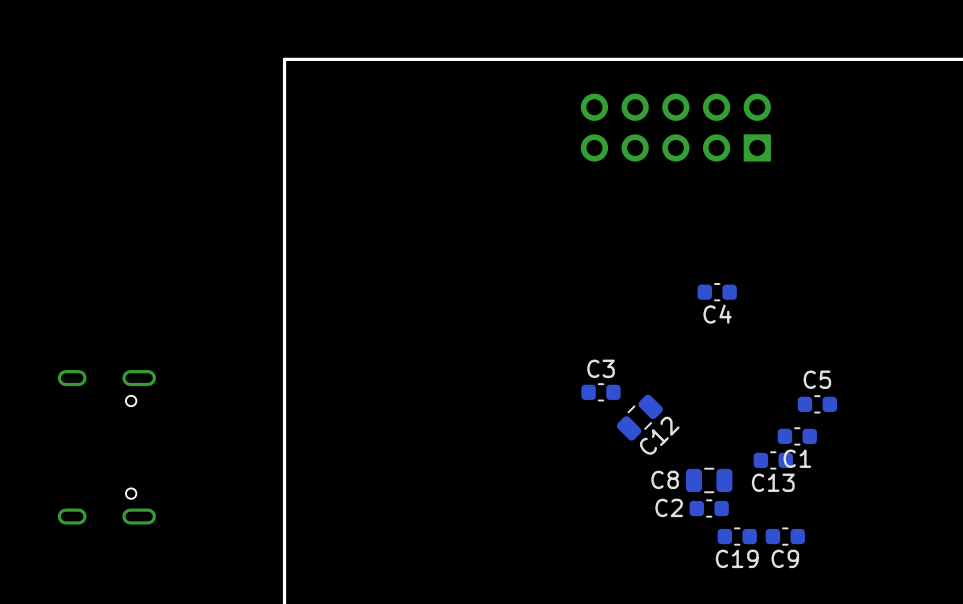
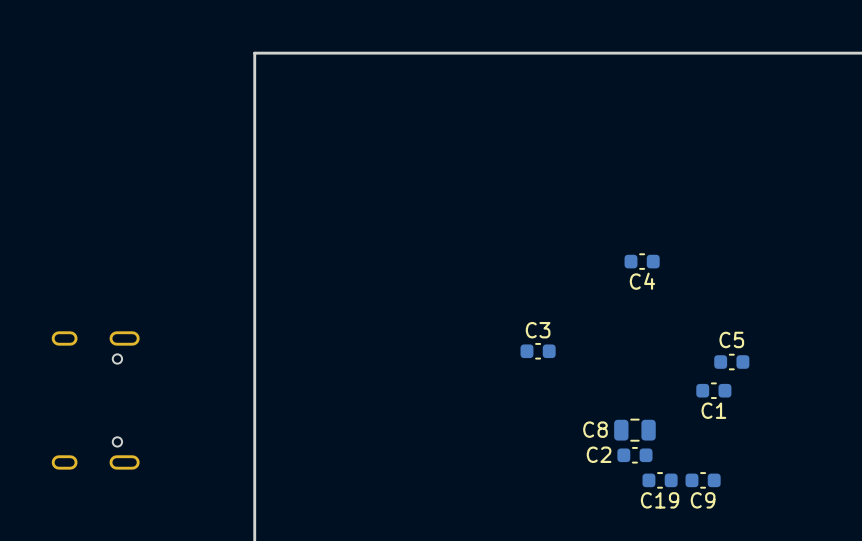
part: (675, 127) -> none
C12: (639, 417) -> none
C13: (773, 460) -> none

